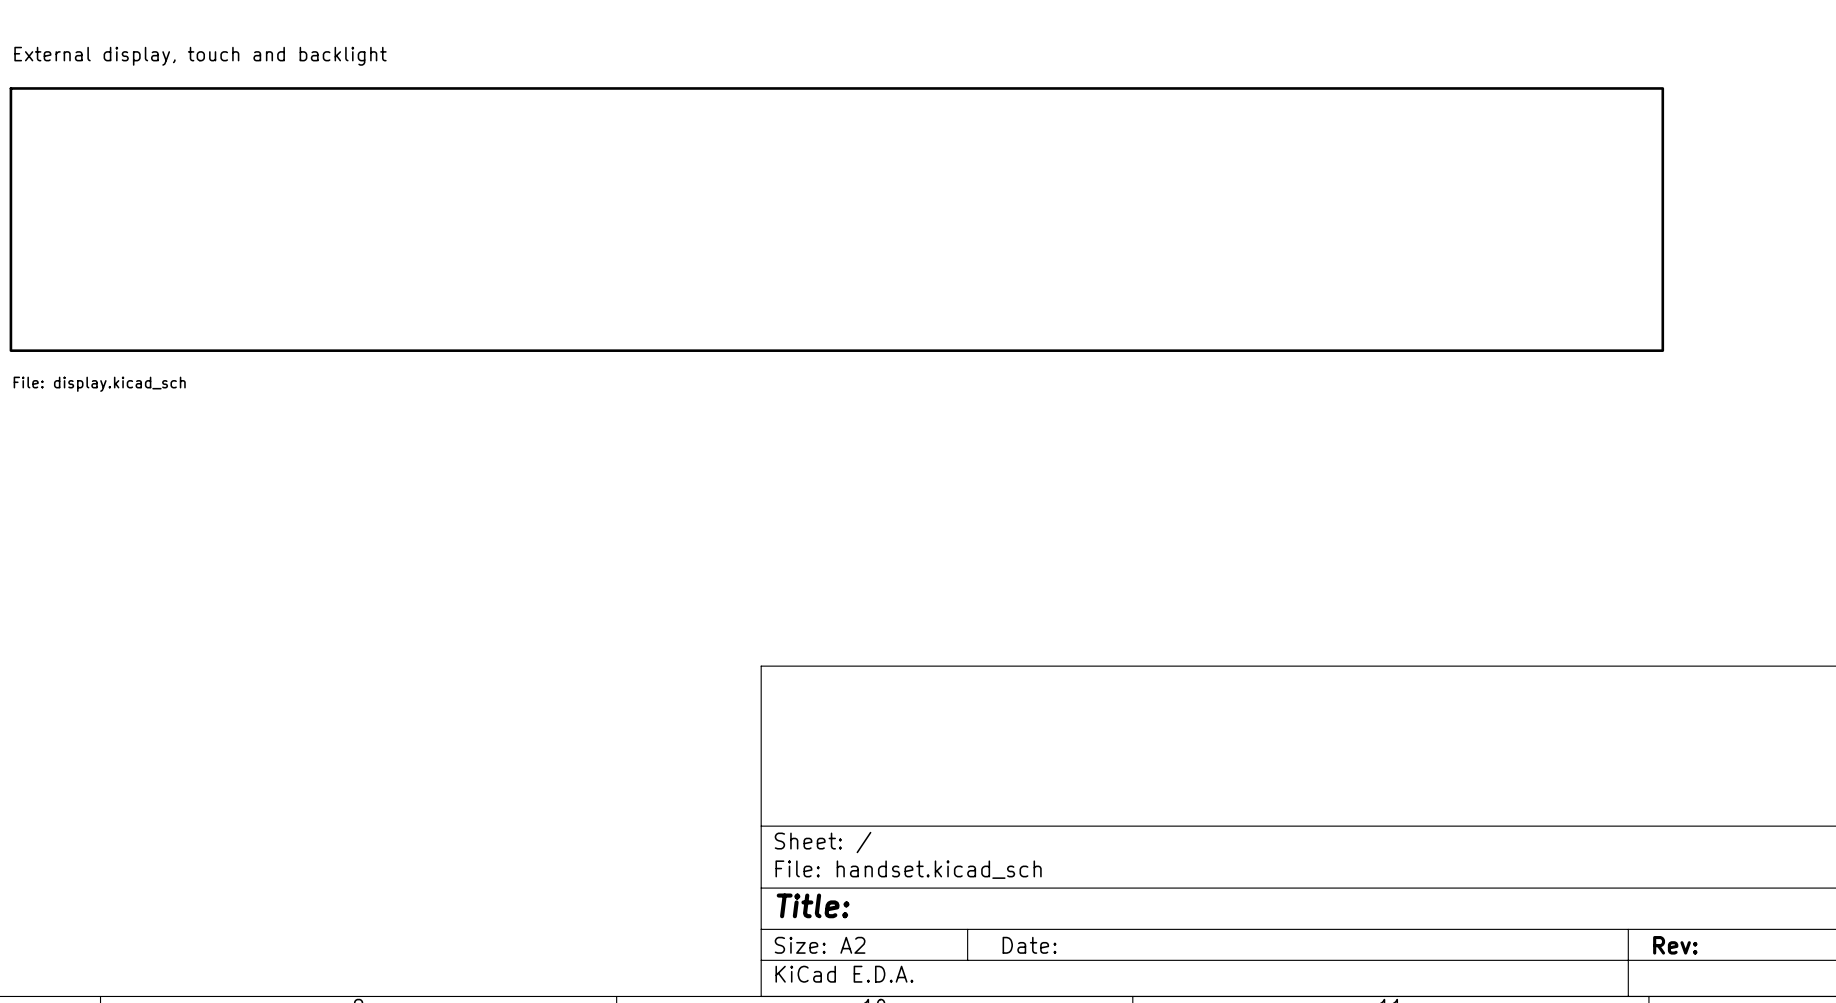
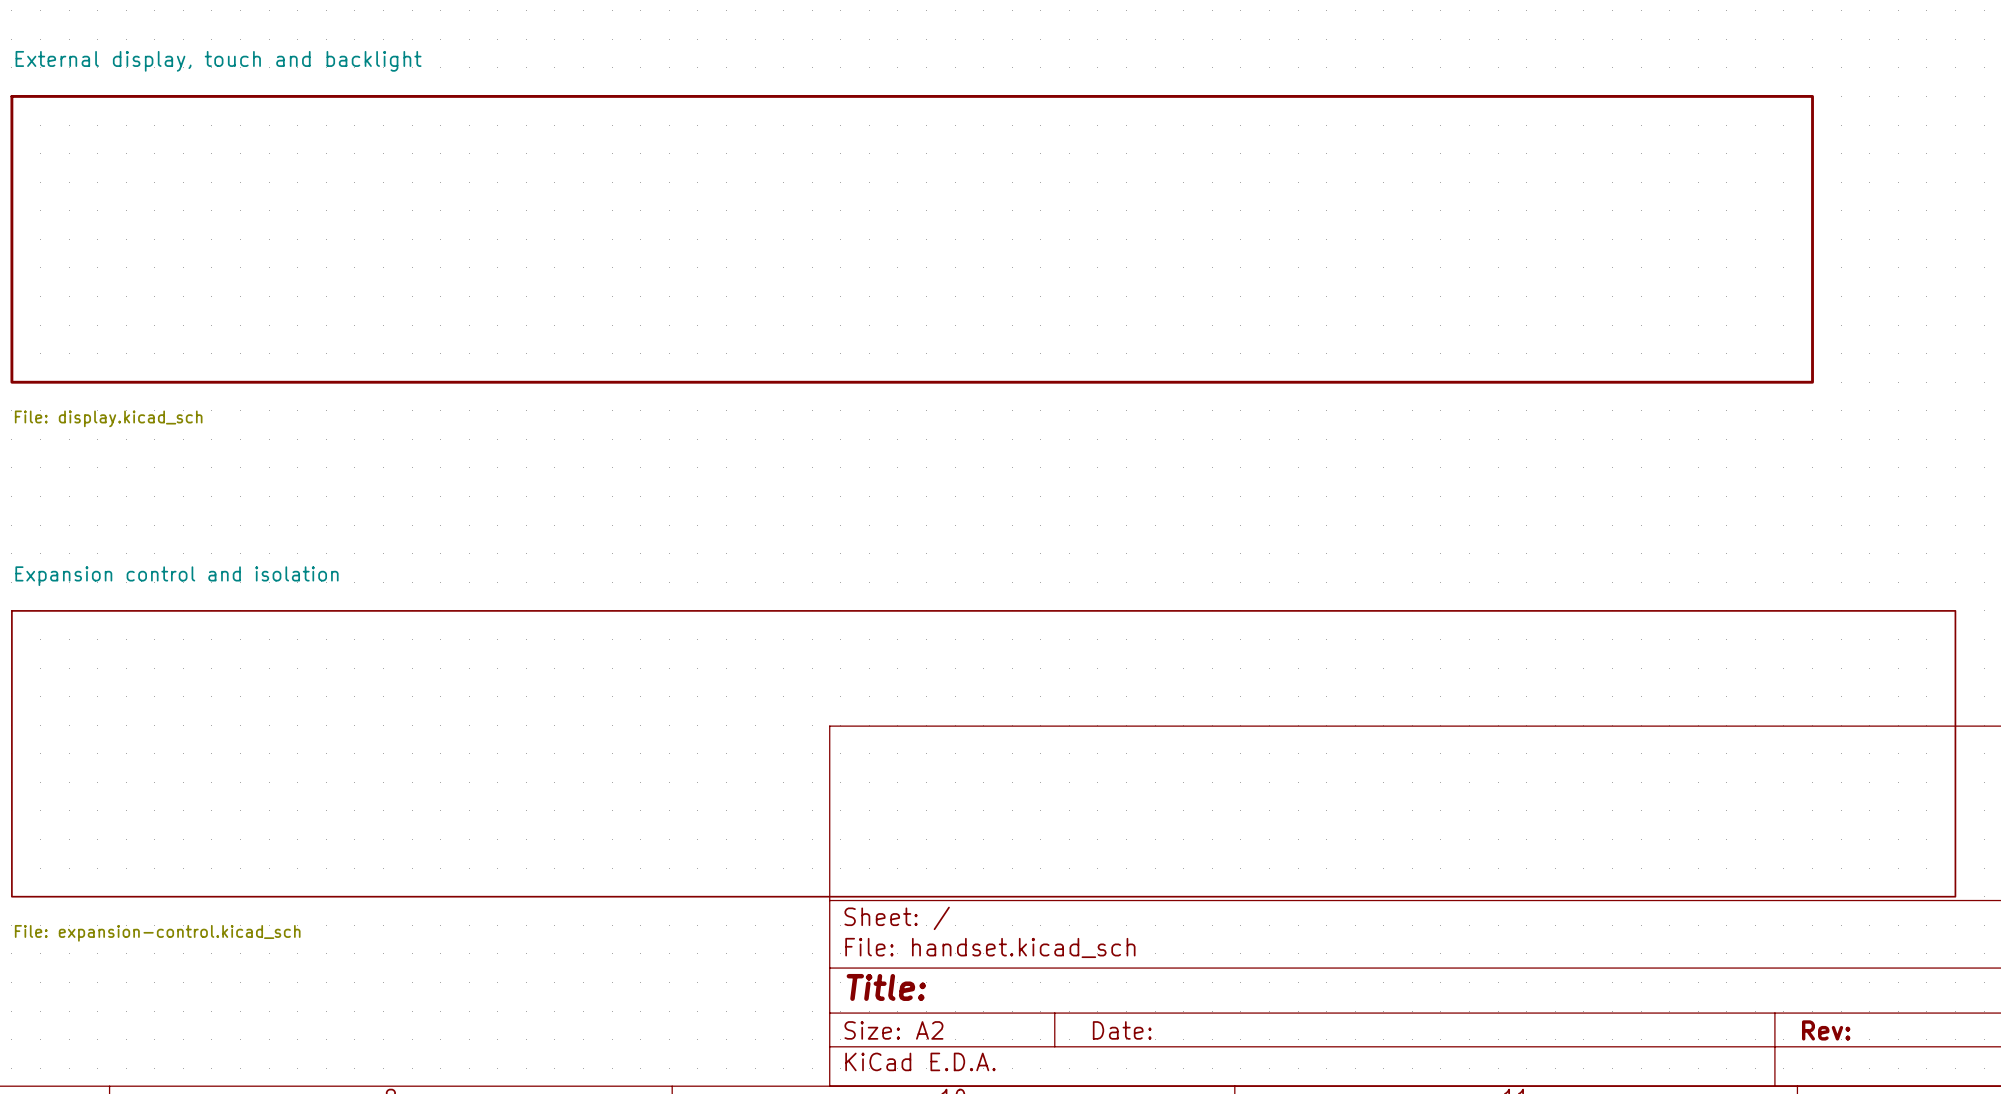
sheet Expansion control and isolation: none -> File: expansion-control.kicad_sch (983, 753)

